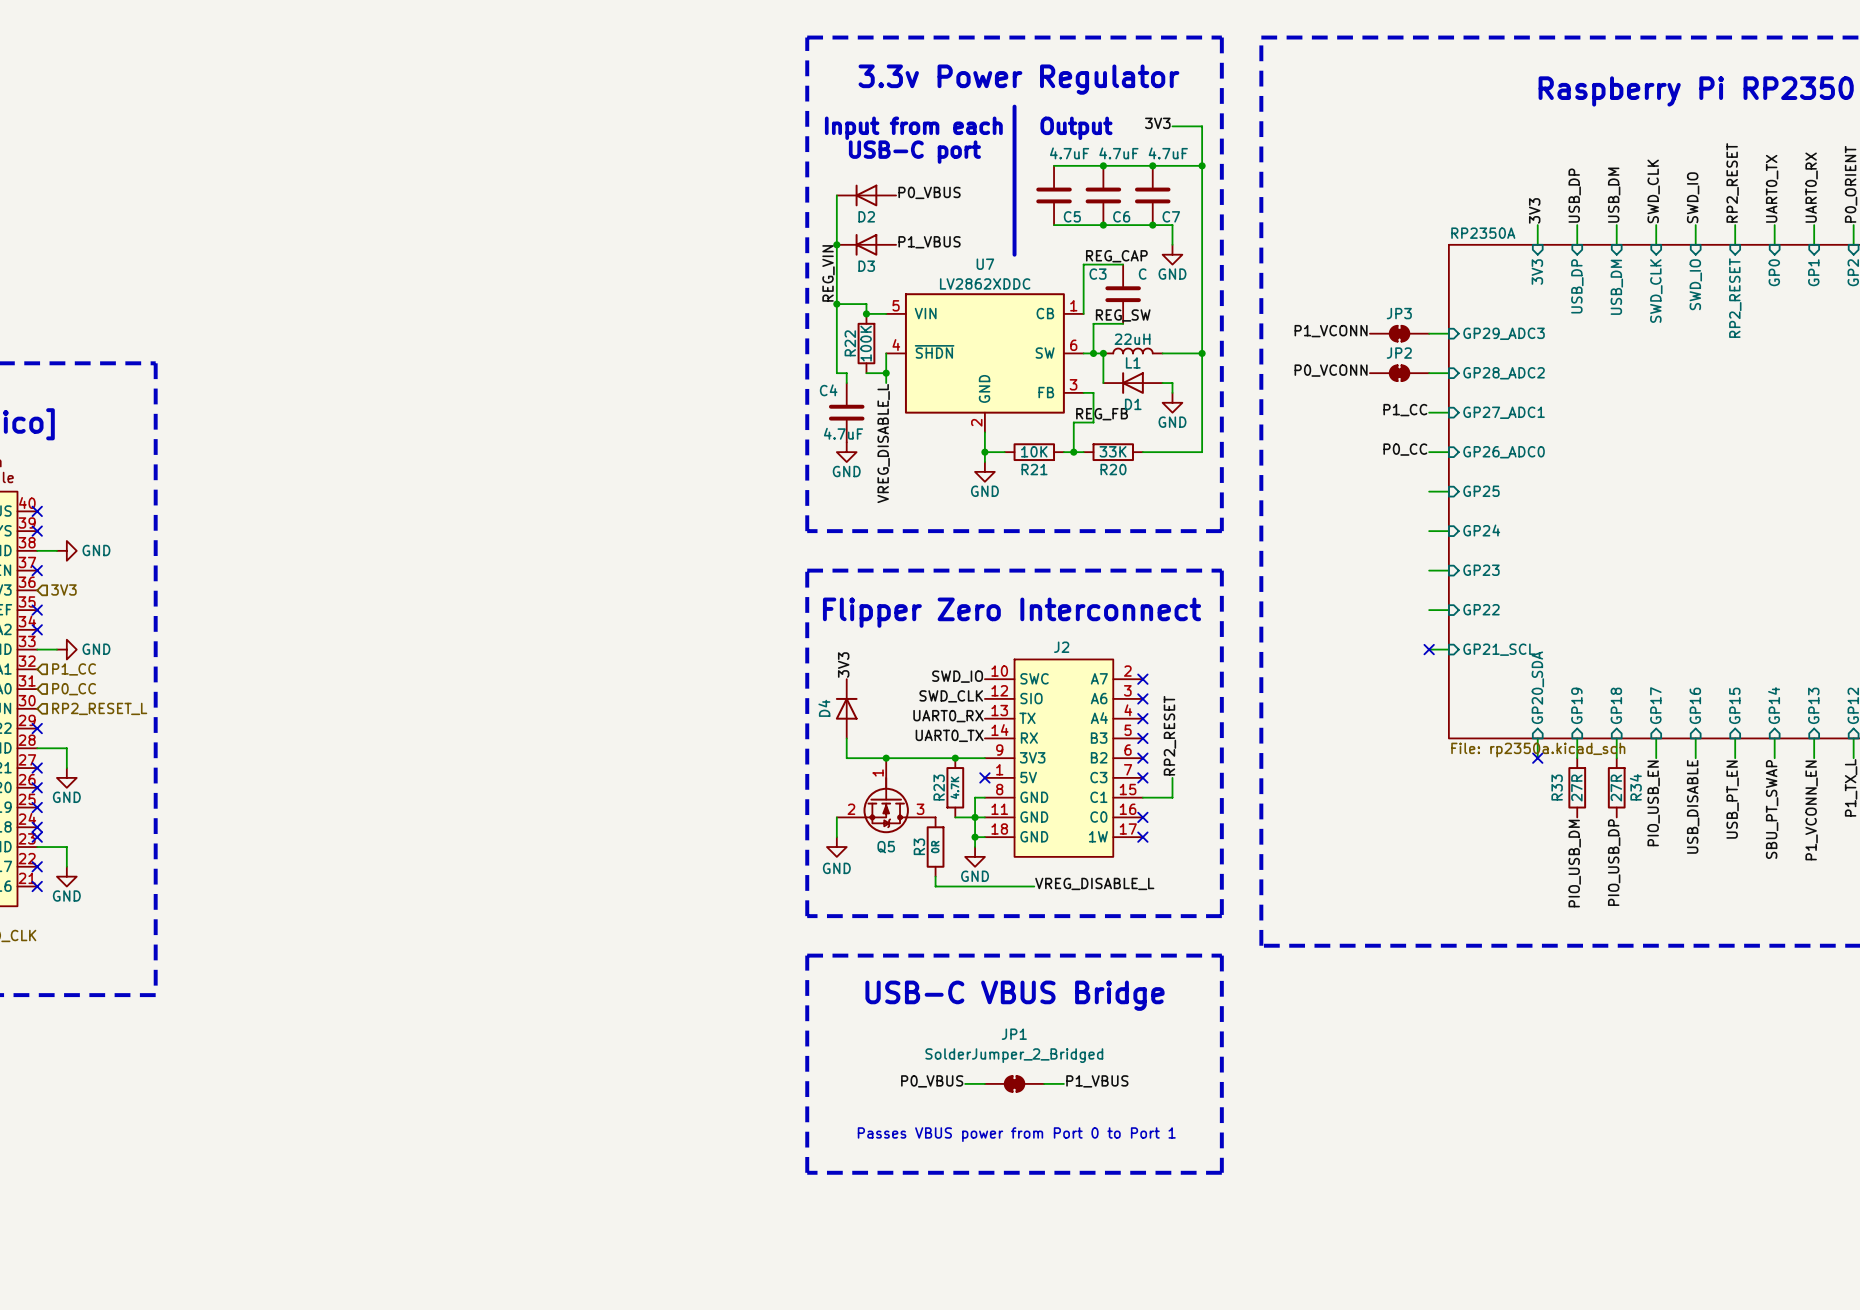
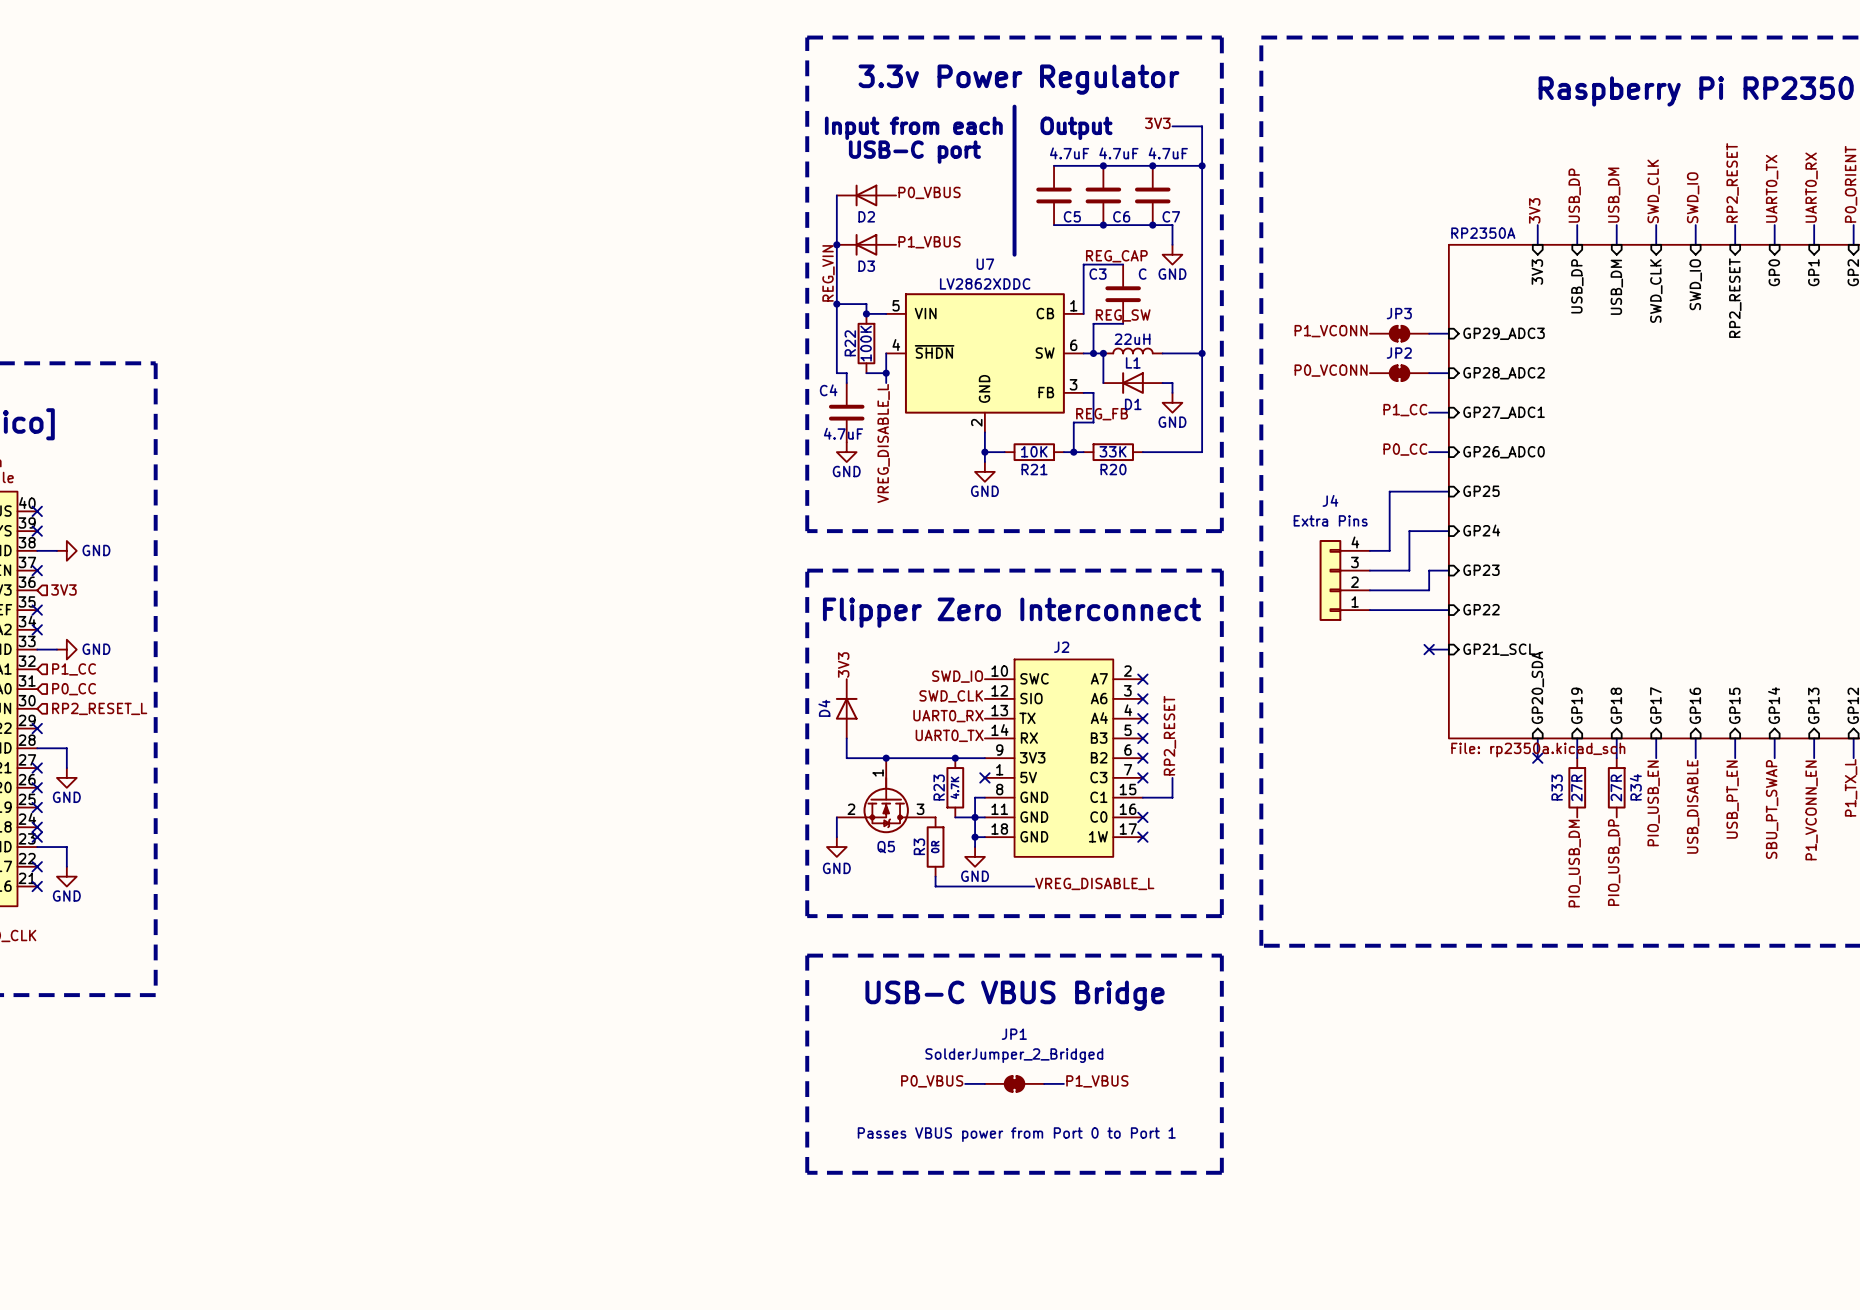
wire: none -> (1429, 491) (1389, 491) (1389, 550) (1369, 550)
wire: none -> (1429, 531) (1409, 531) (1409, 570) (1369, 570)
wire: none -> (1429, 570) (1429, 590) (1369, 590)
J4: none -> Extra Pins (1344, 580)
wire: none -> (1369, 610) (1429, 610)

